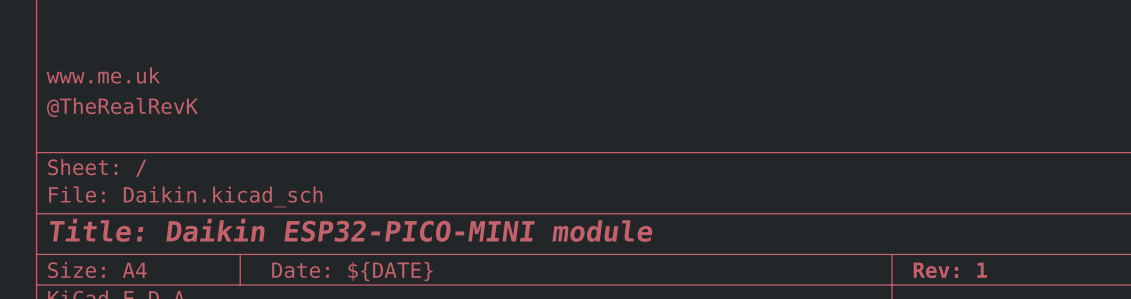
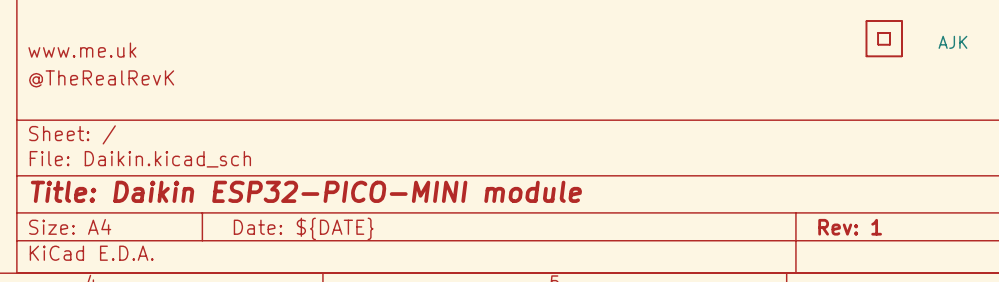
part: none -> (884, 38)
part: none -> AJK (952, 42)

